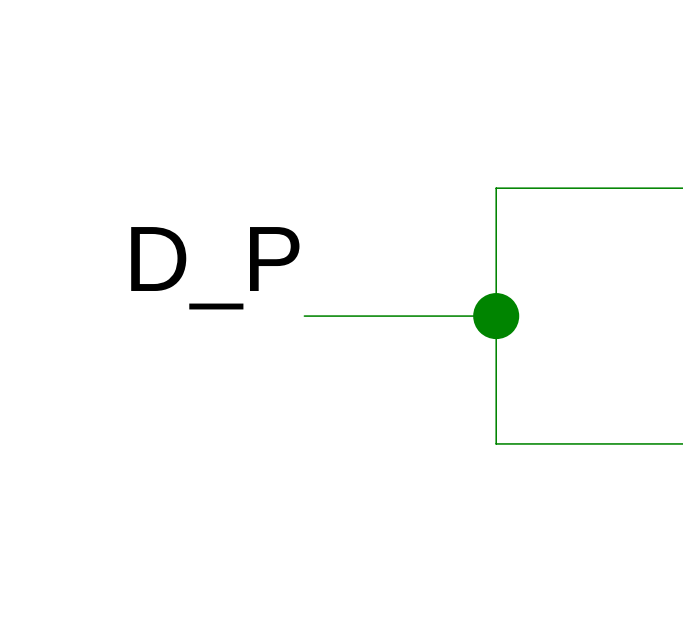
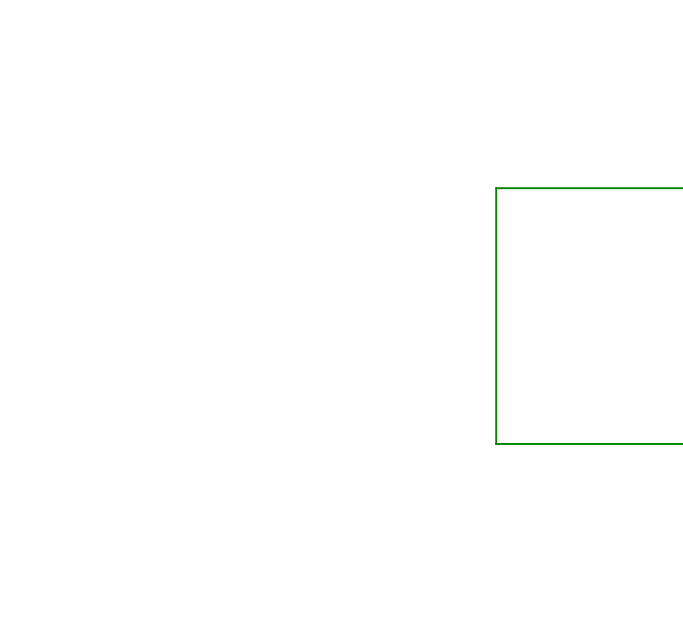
label: D_P (215, 268) -> none
wire: (304, 316) (496, 316) -> none
junction: (496, 316) -> none

